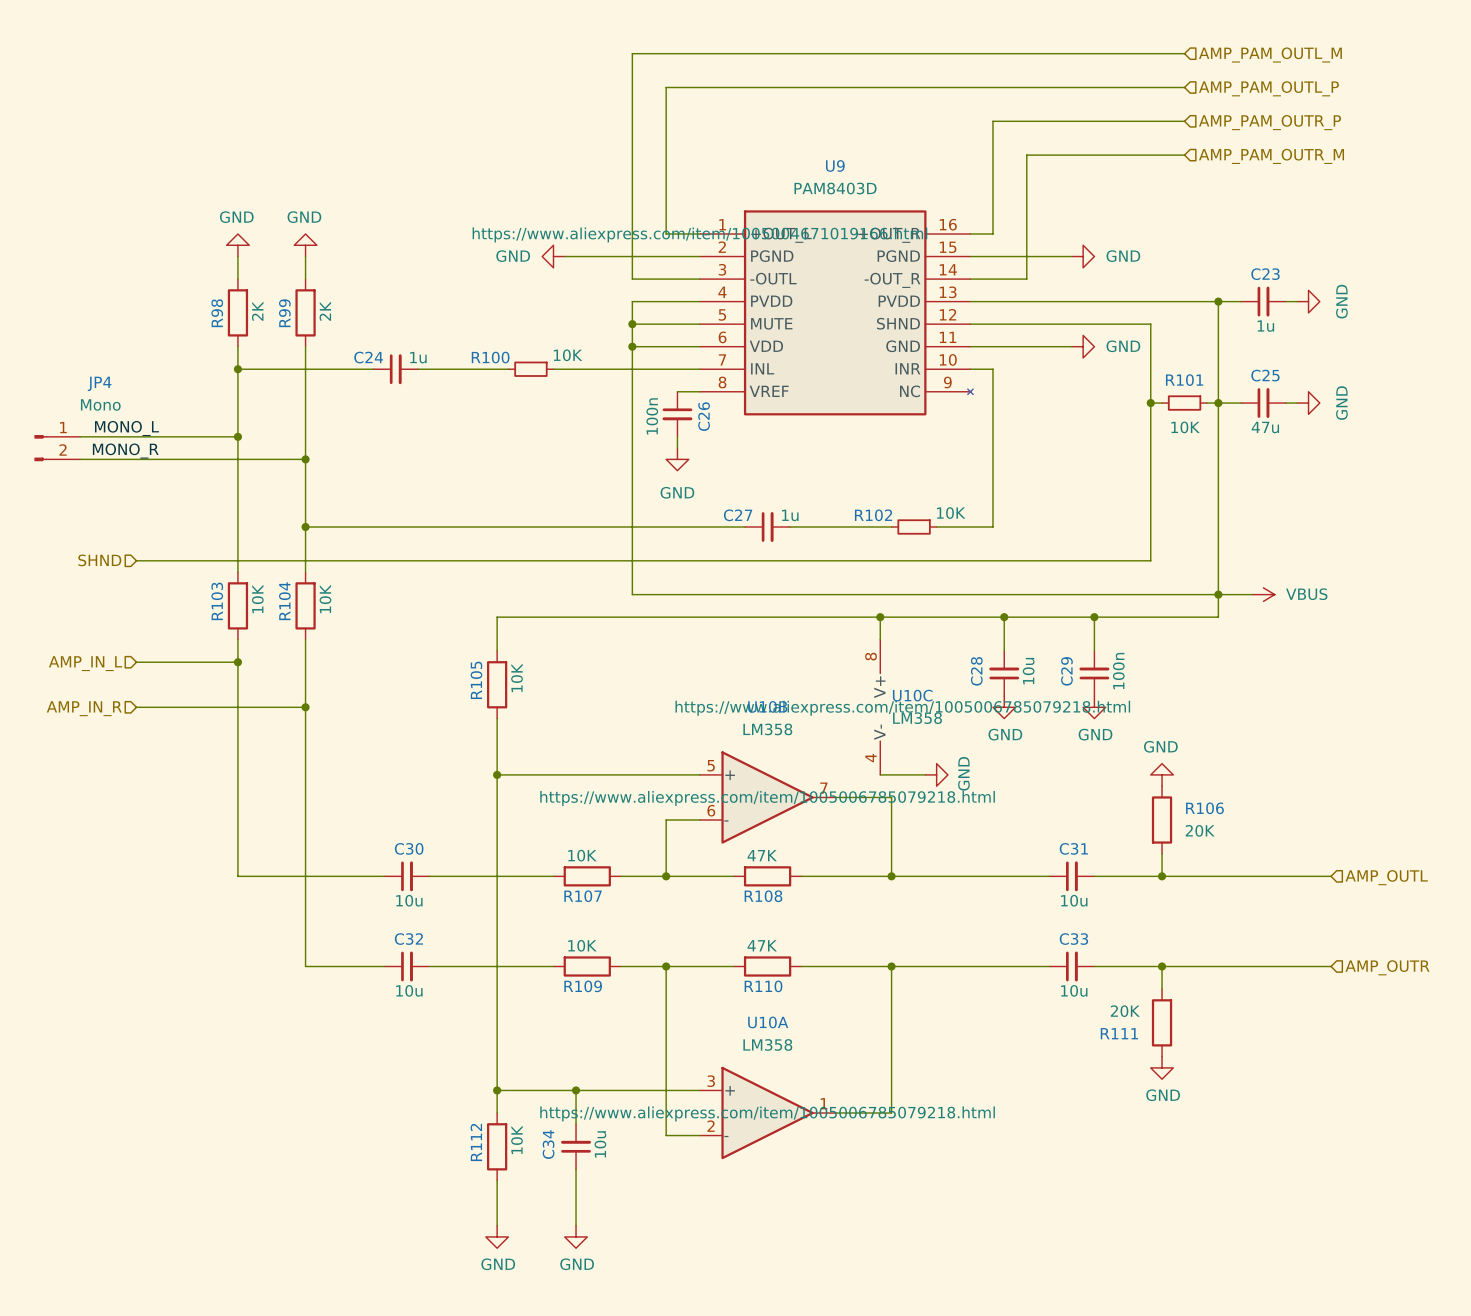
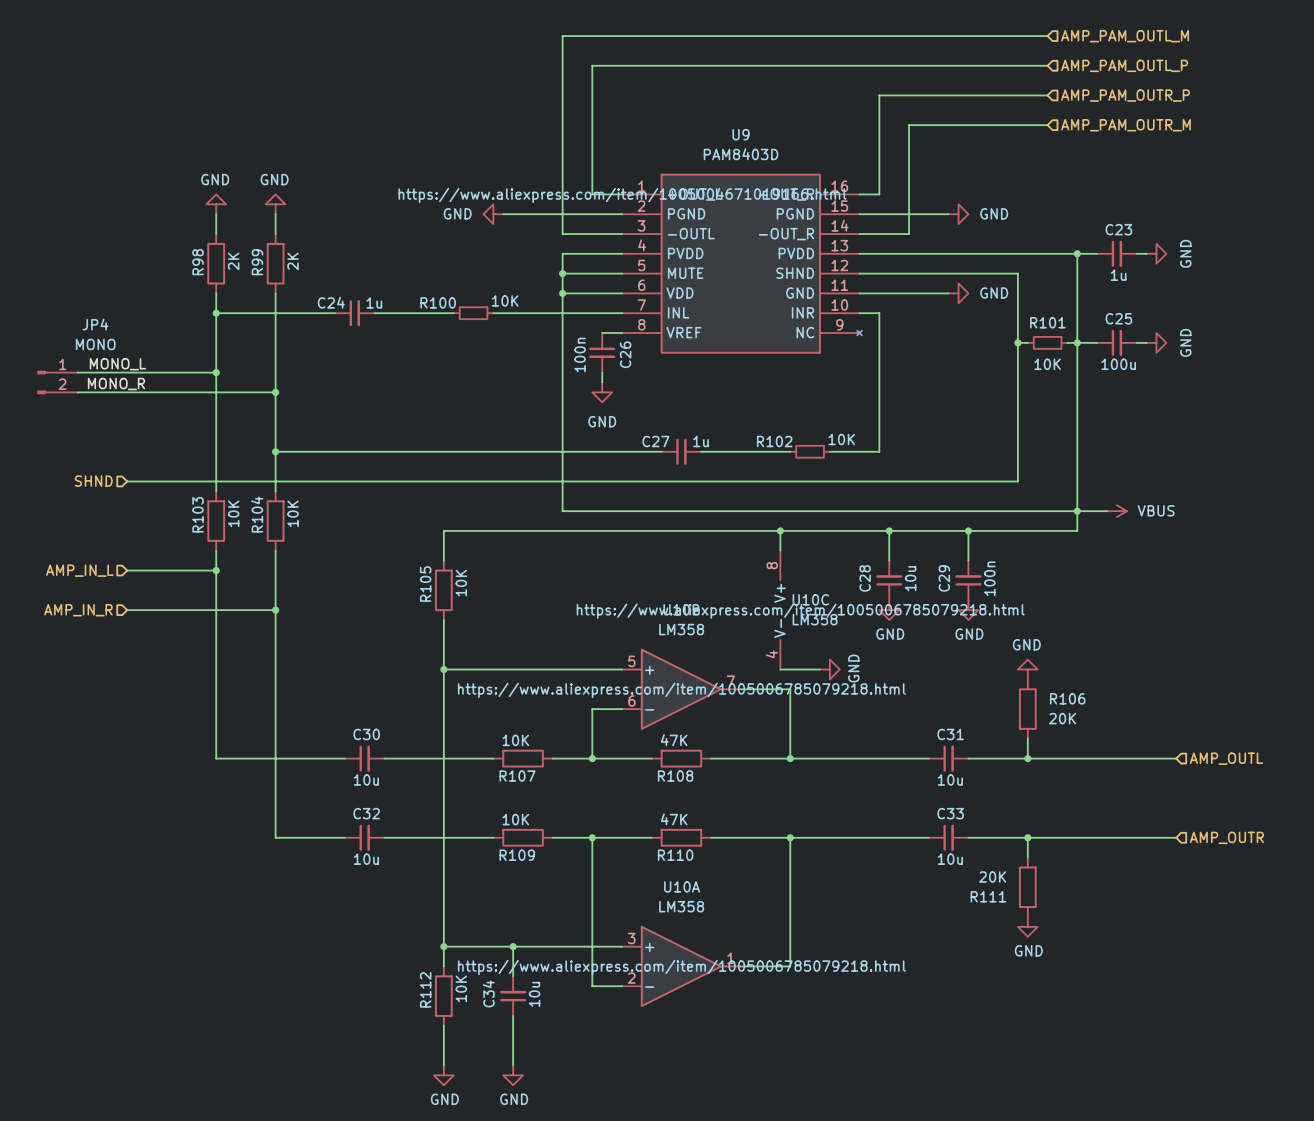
JP4 value: Mono (100, 404) -> MONO (95, 344)
C25 value: 47u (1265, 427) -> 100u (1118, 364)

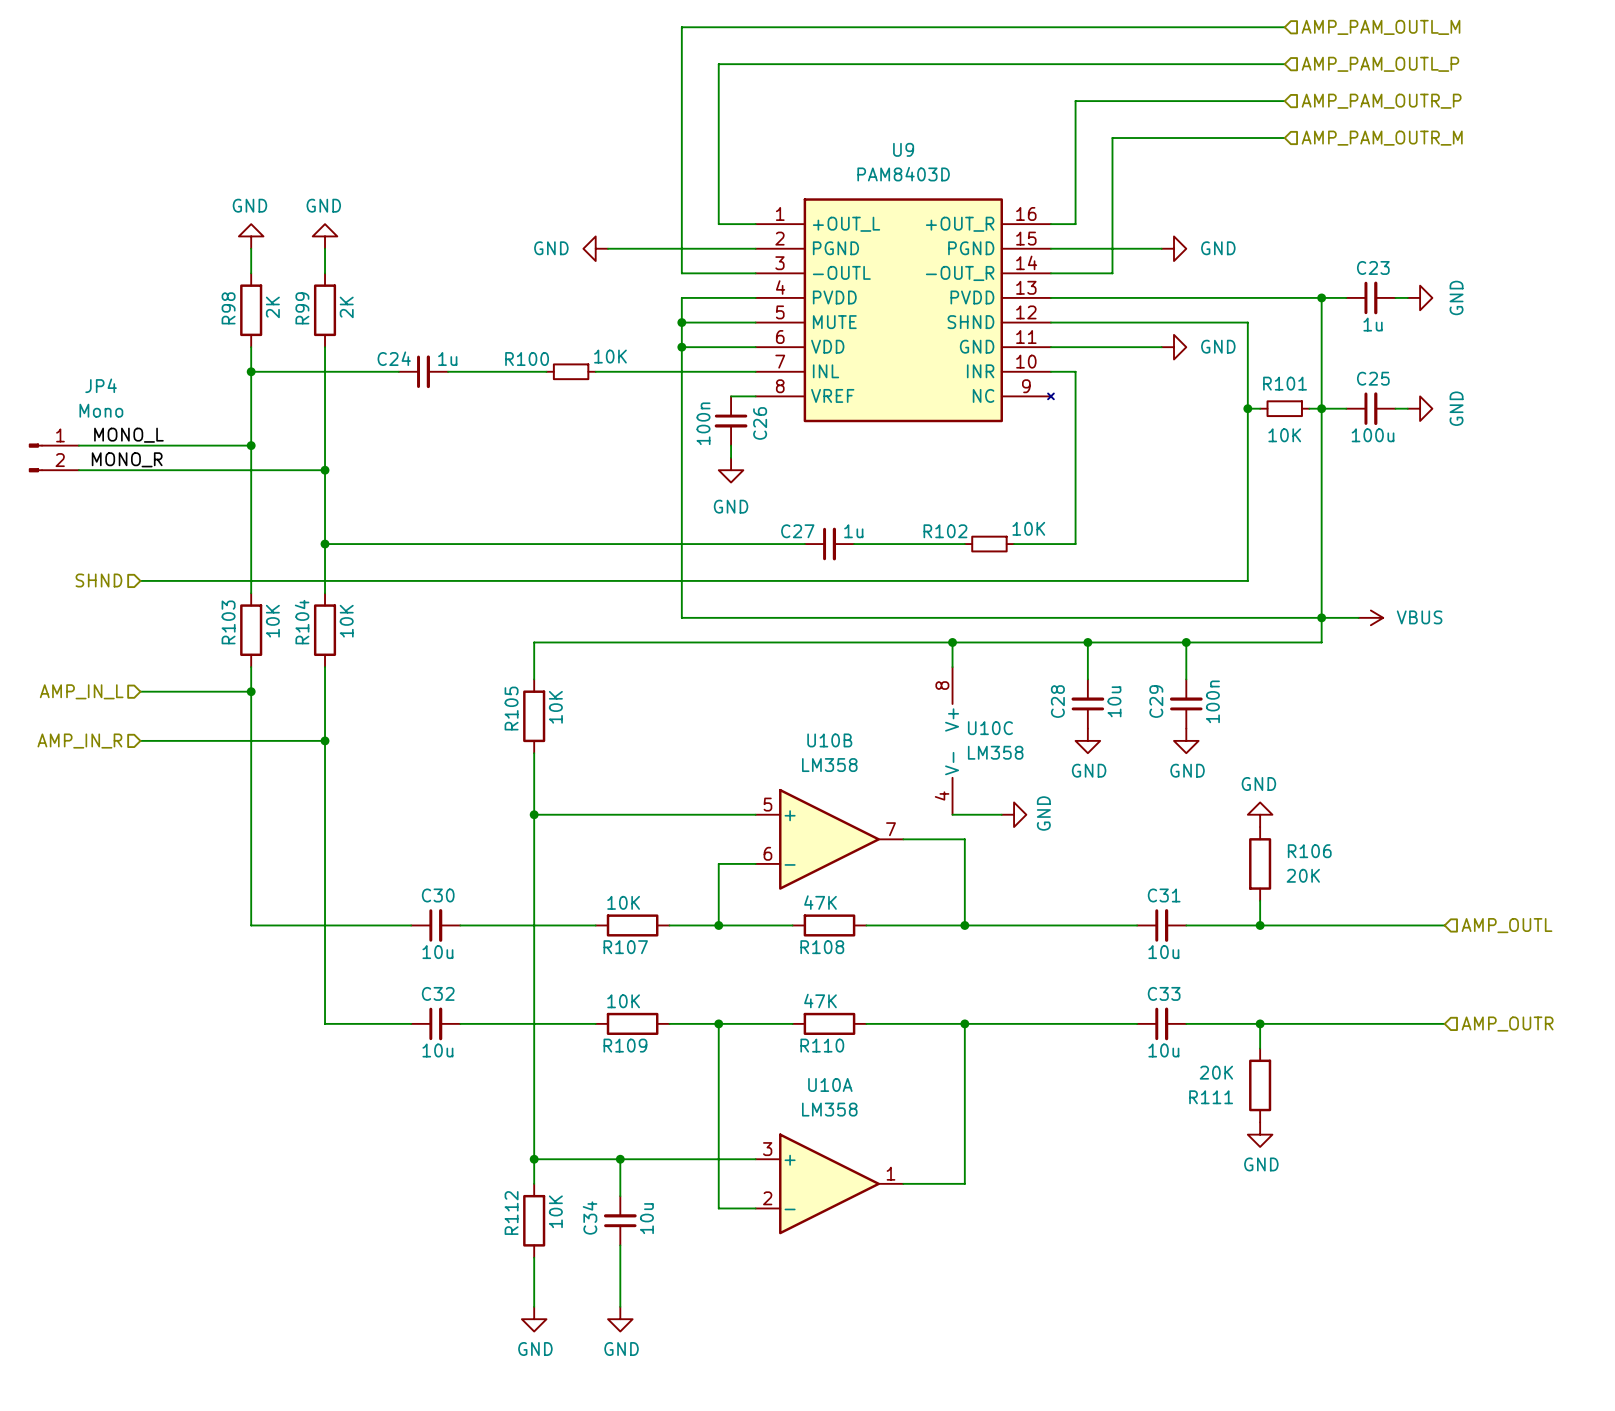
U9 text: https://www.aliexpress.com/item/1005004671019166.html (622, 195) -> none
JP4 value: MONO (95, 344) -> Mono (101, 410)
U10C text: https://www.aliexpress.com/item/1005006785079218.html (800, 611) -> none
U10B text: https://www.aliexpress.com/item/1005006785079218.html (681, 690) -> none
U10A text: https://www.aliexpress.com/item/1005006785079218.html (681, 967) -> none

